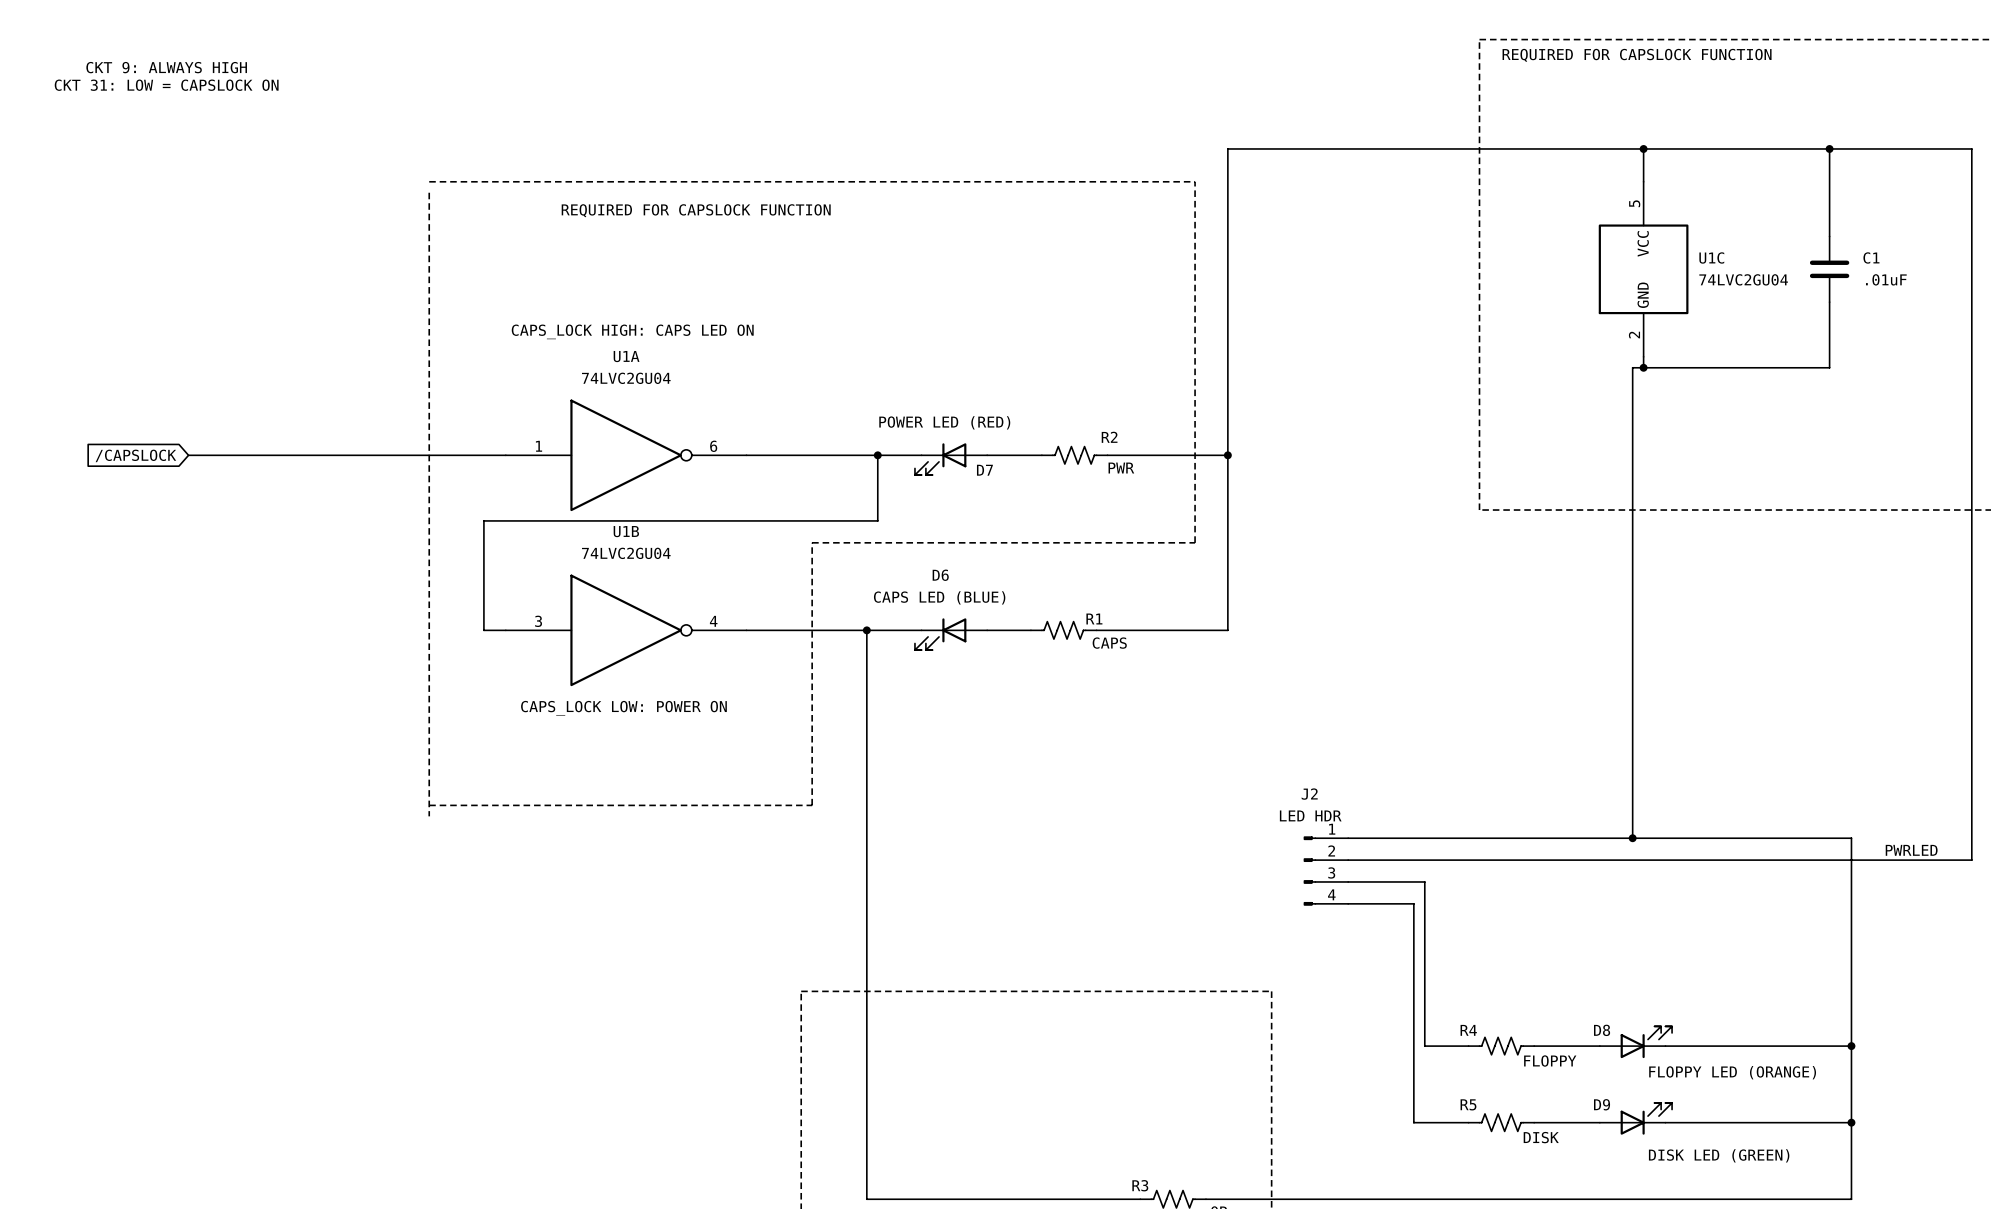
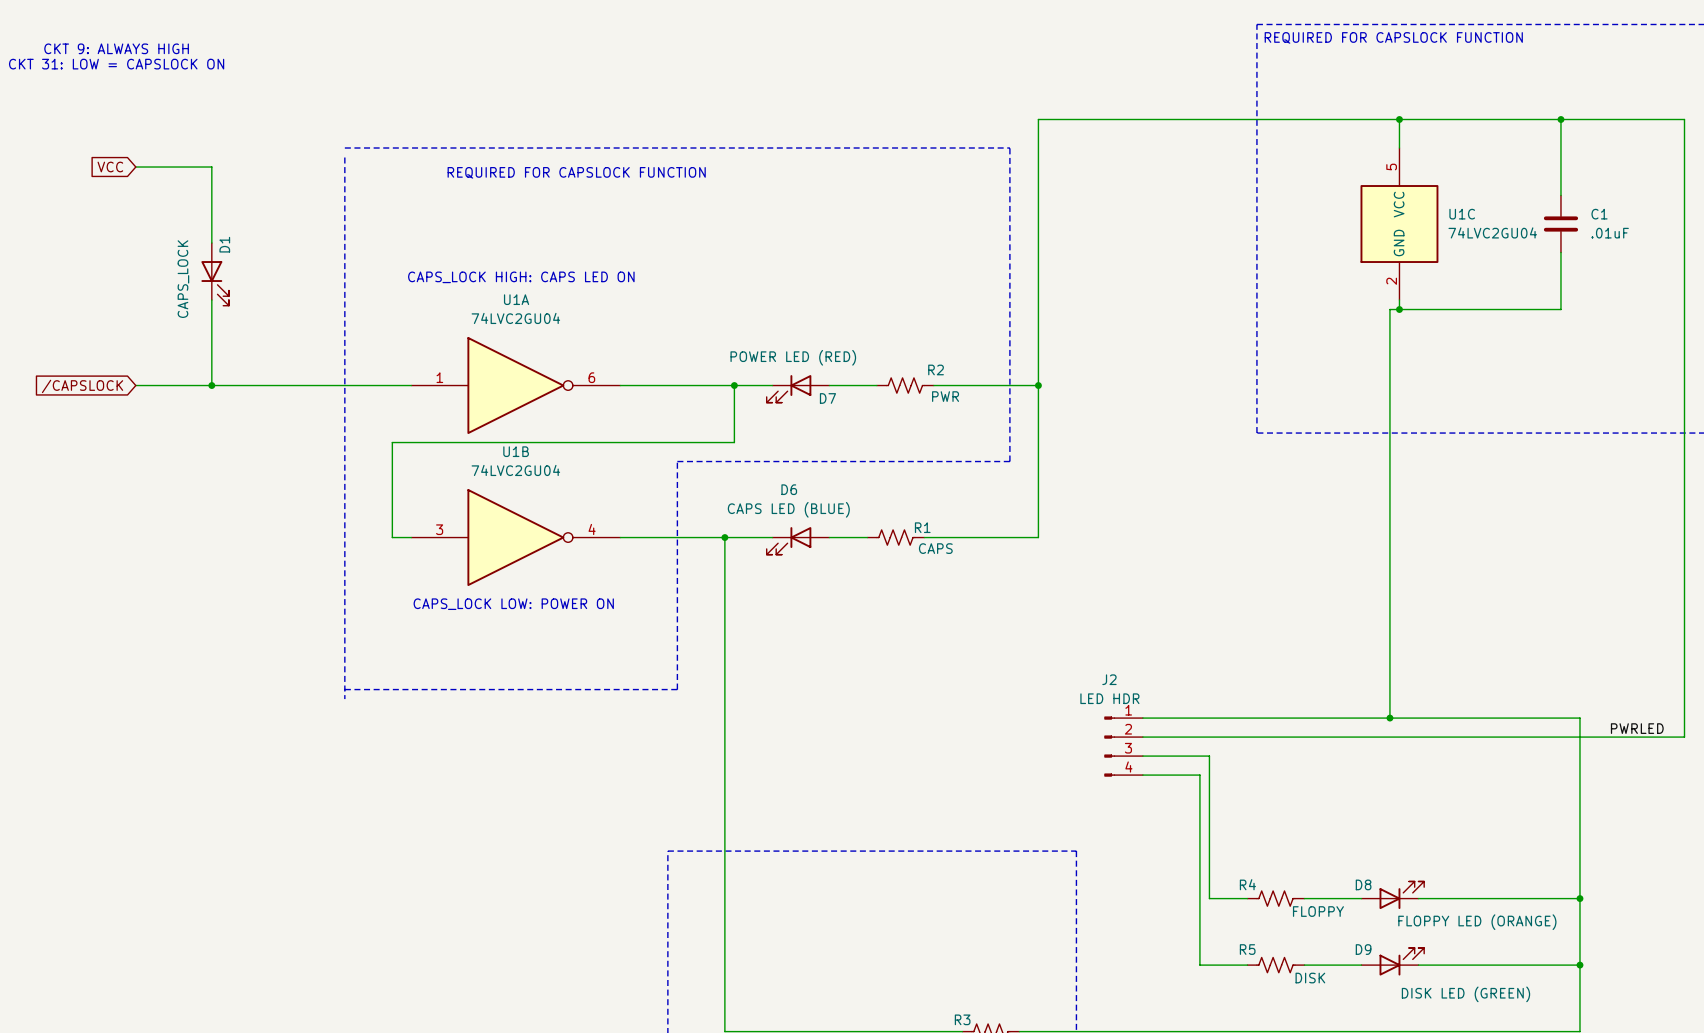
global label: none -> VCC (110, 167)
wire: none -> (135, 167) (211, 167) (211, 243)
D1: none -> CAPS_LOCK (215, 274)
wire: none -> (211, 300) (211, 385)
junction: none -> (211, 385)

